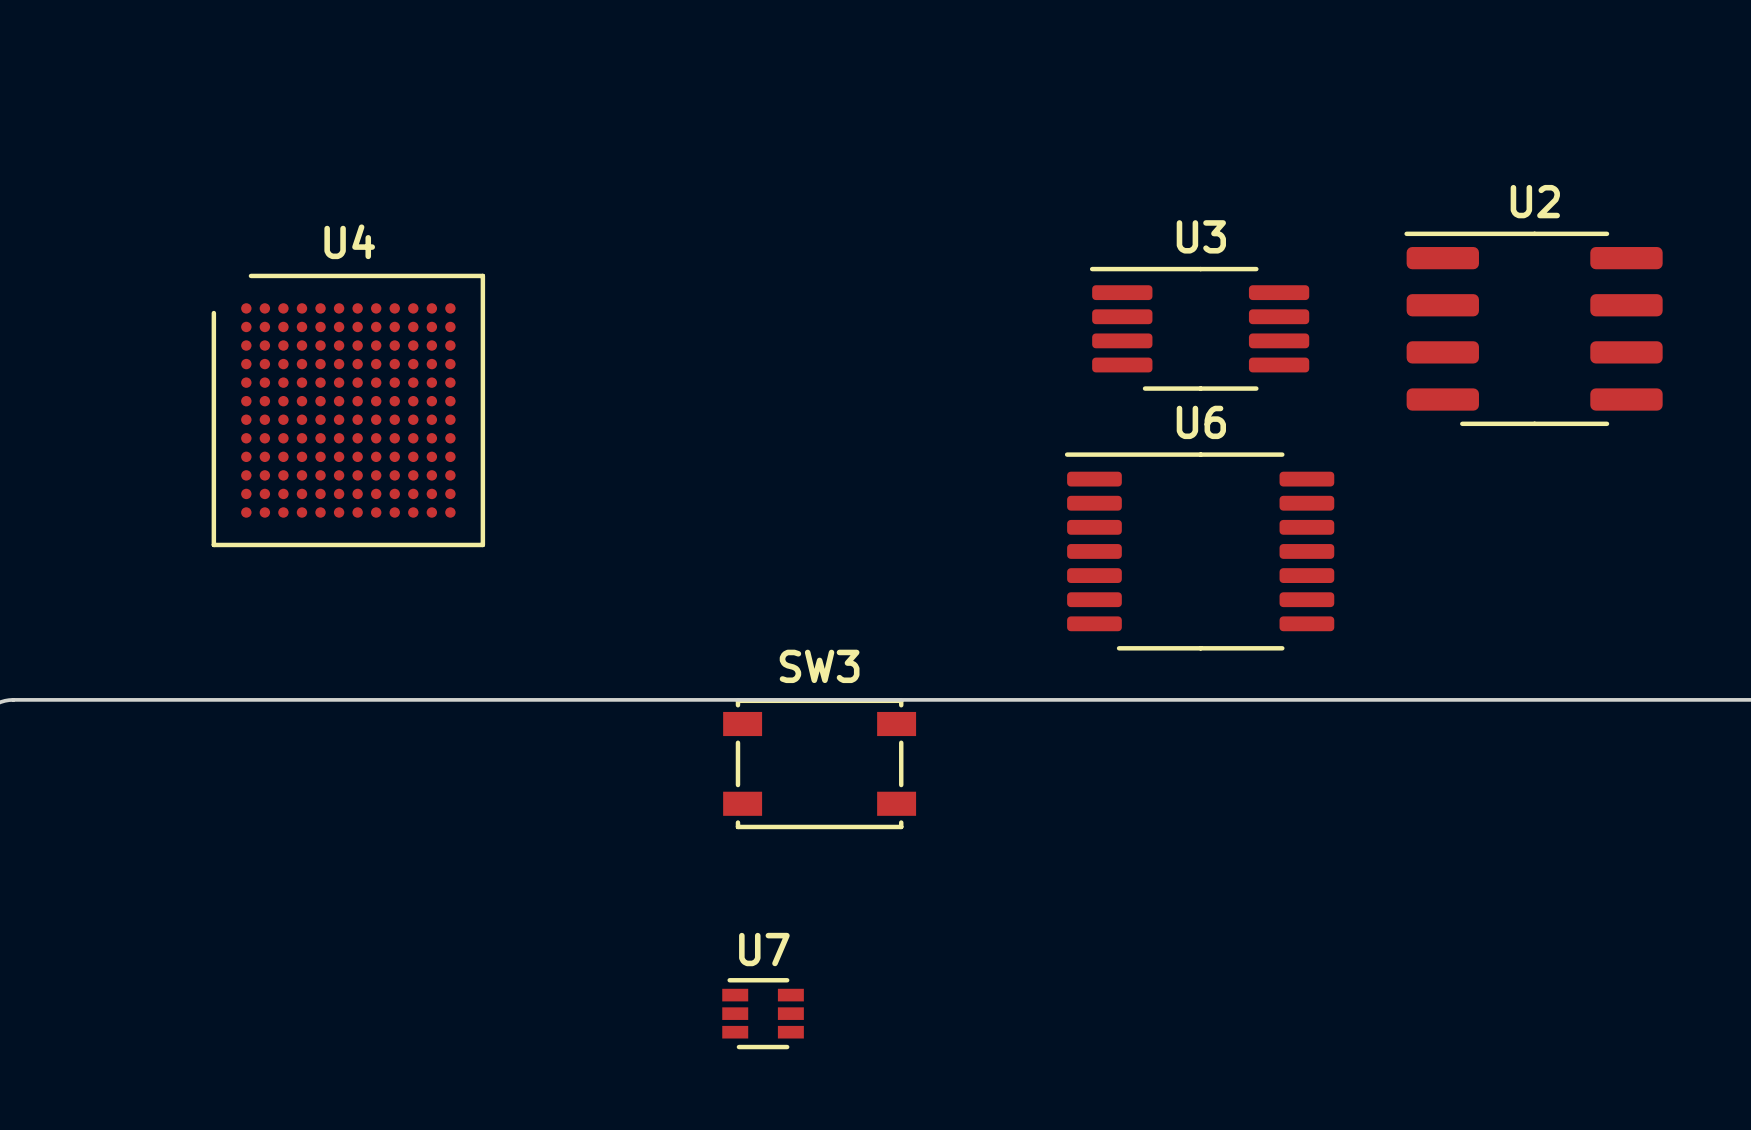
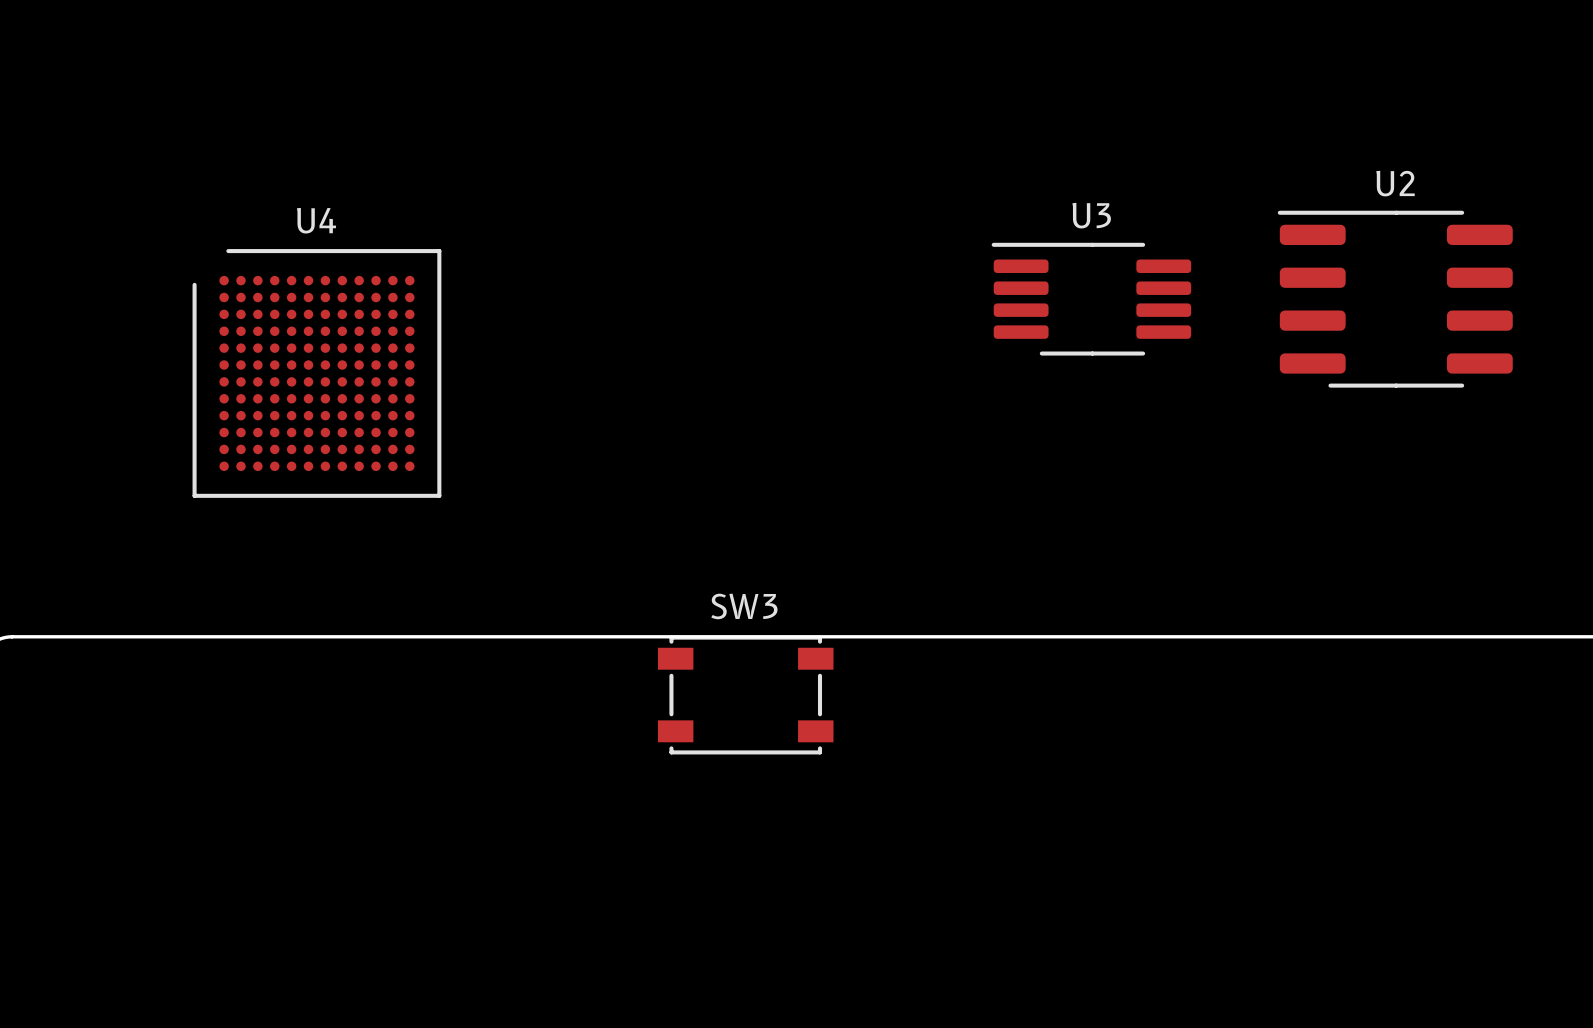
U6: (1199, 551) -> none
U7: (763, 1013) -> none

